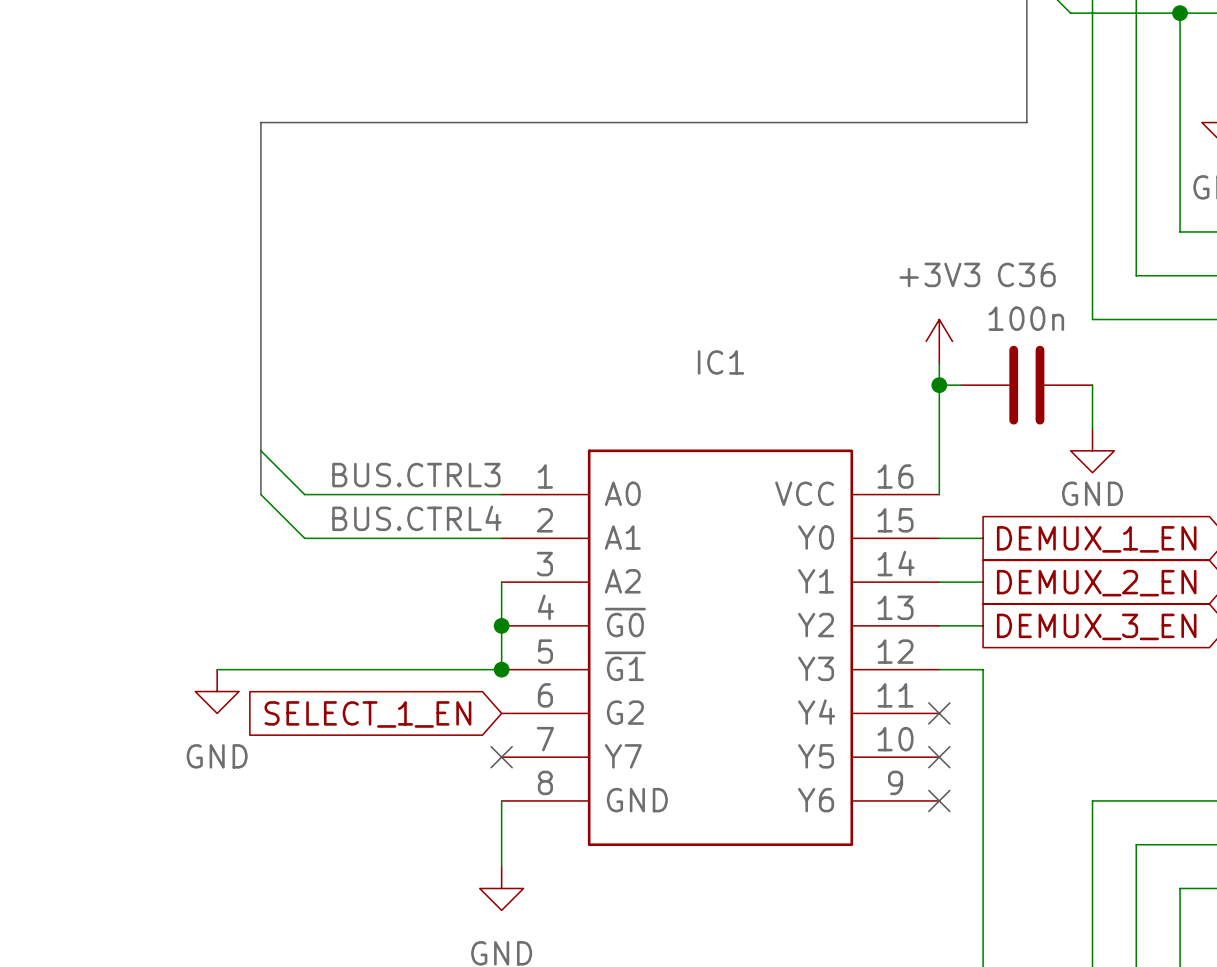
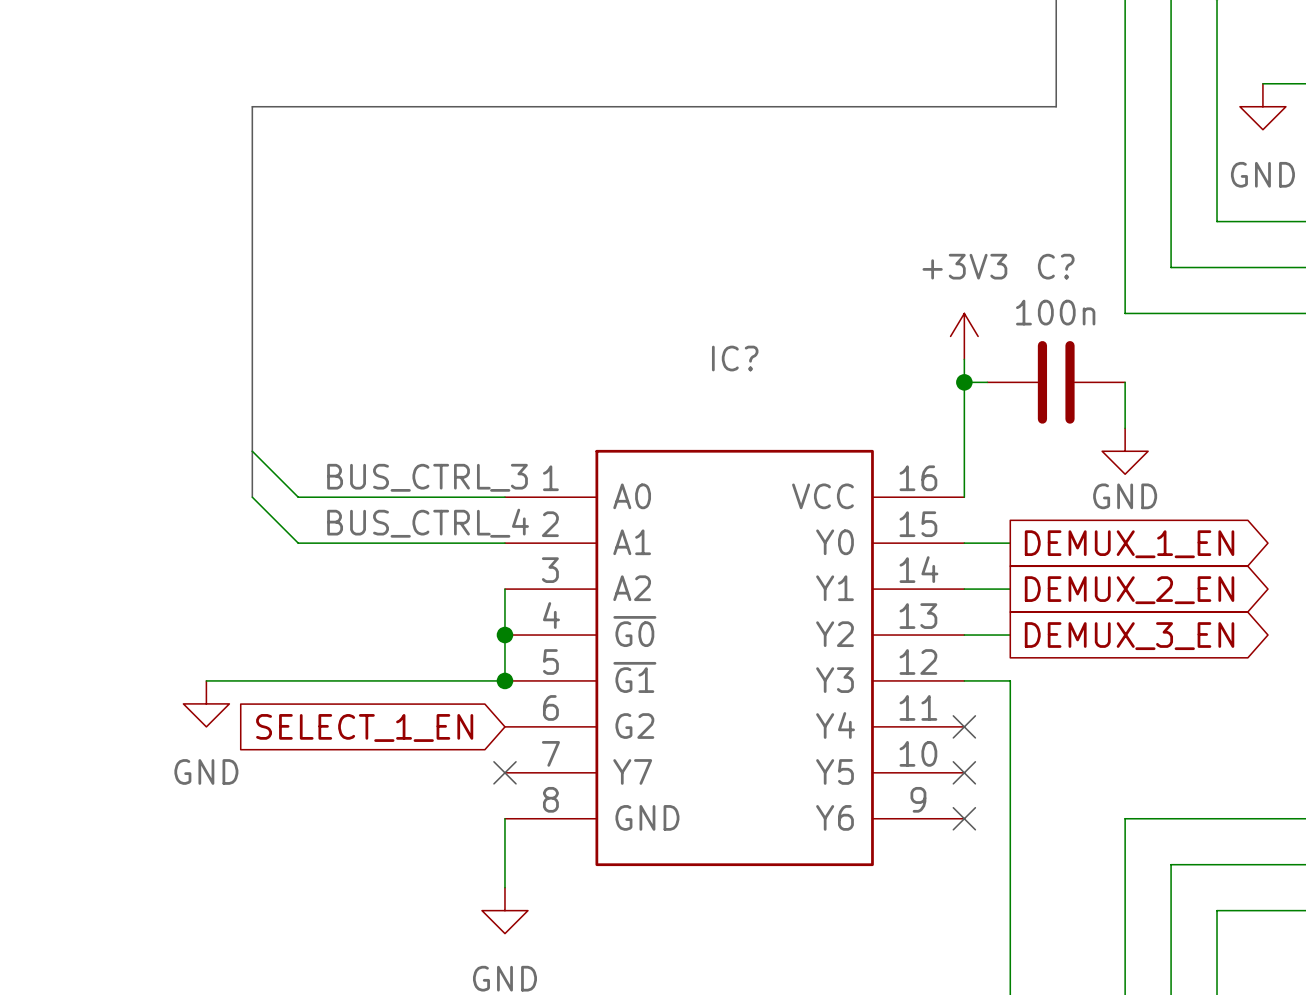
C36 name: C36 (1026, 274) -> C? (1056, 266)
IC1 name: IC1 (721, 362) -> IC? (735, 358)
label: BUS.CTRL3 (416, 475) -> BUS_CTRL_3 (427, 477)
label: BUS.CTRL4 (416, 518) -> BUS_CTRL_4 (428, 523)

